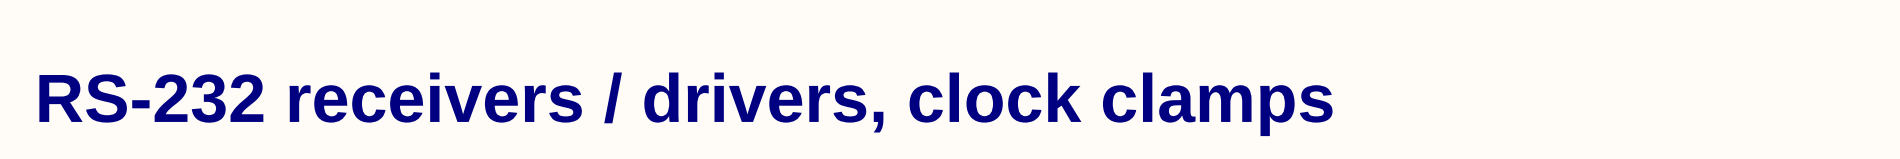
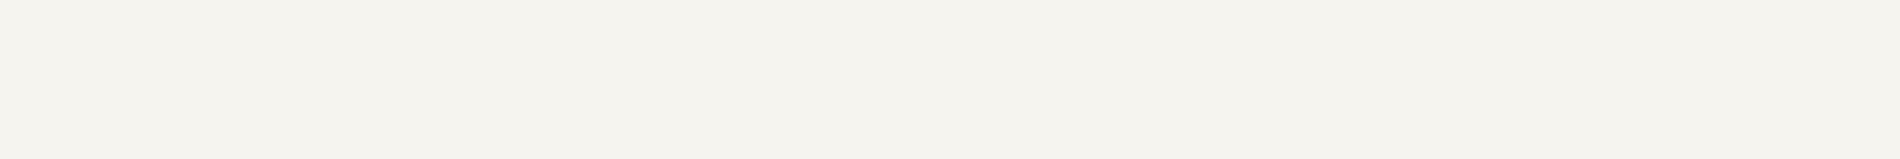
text: RS-232 receivers / drivers, clock clamps (685, 104) -> none

